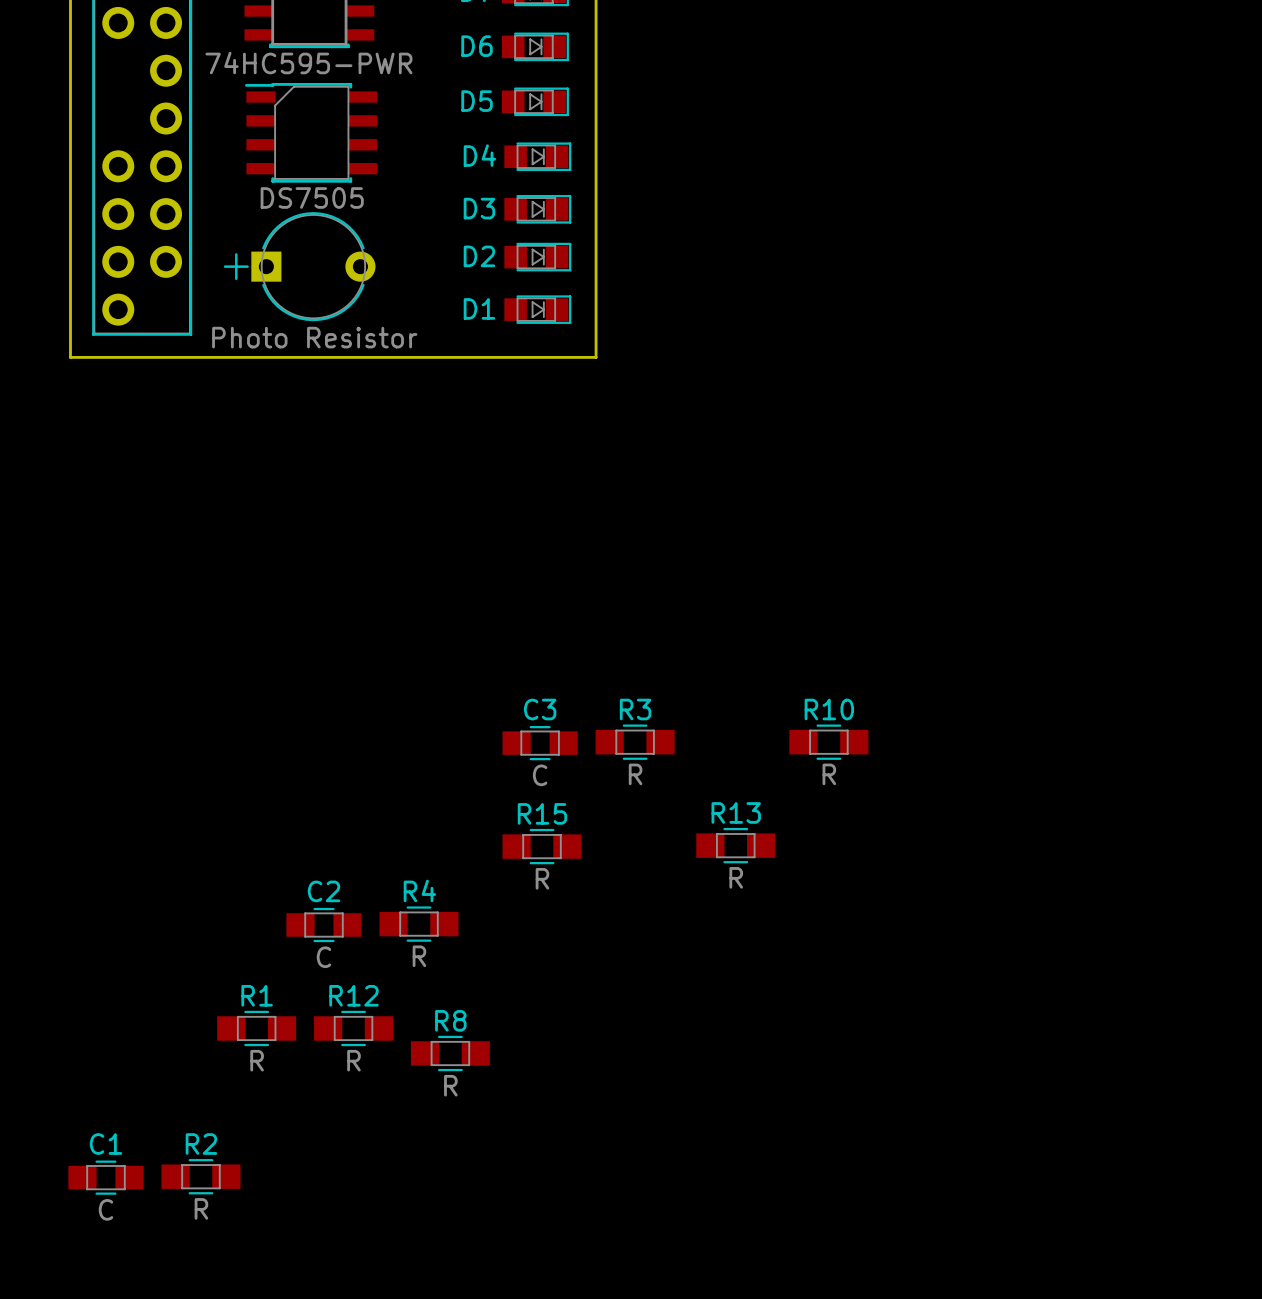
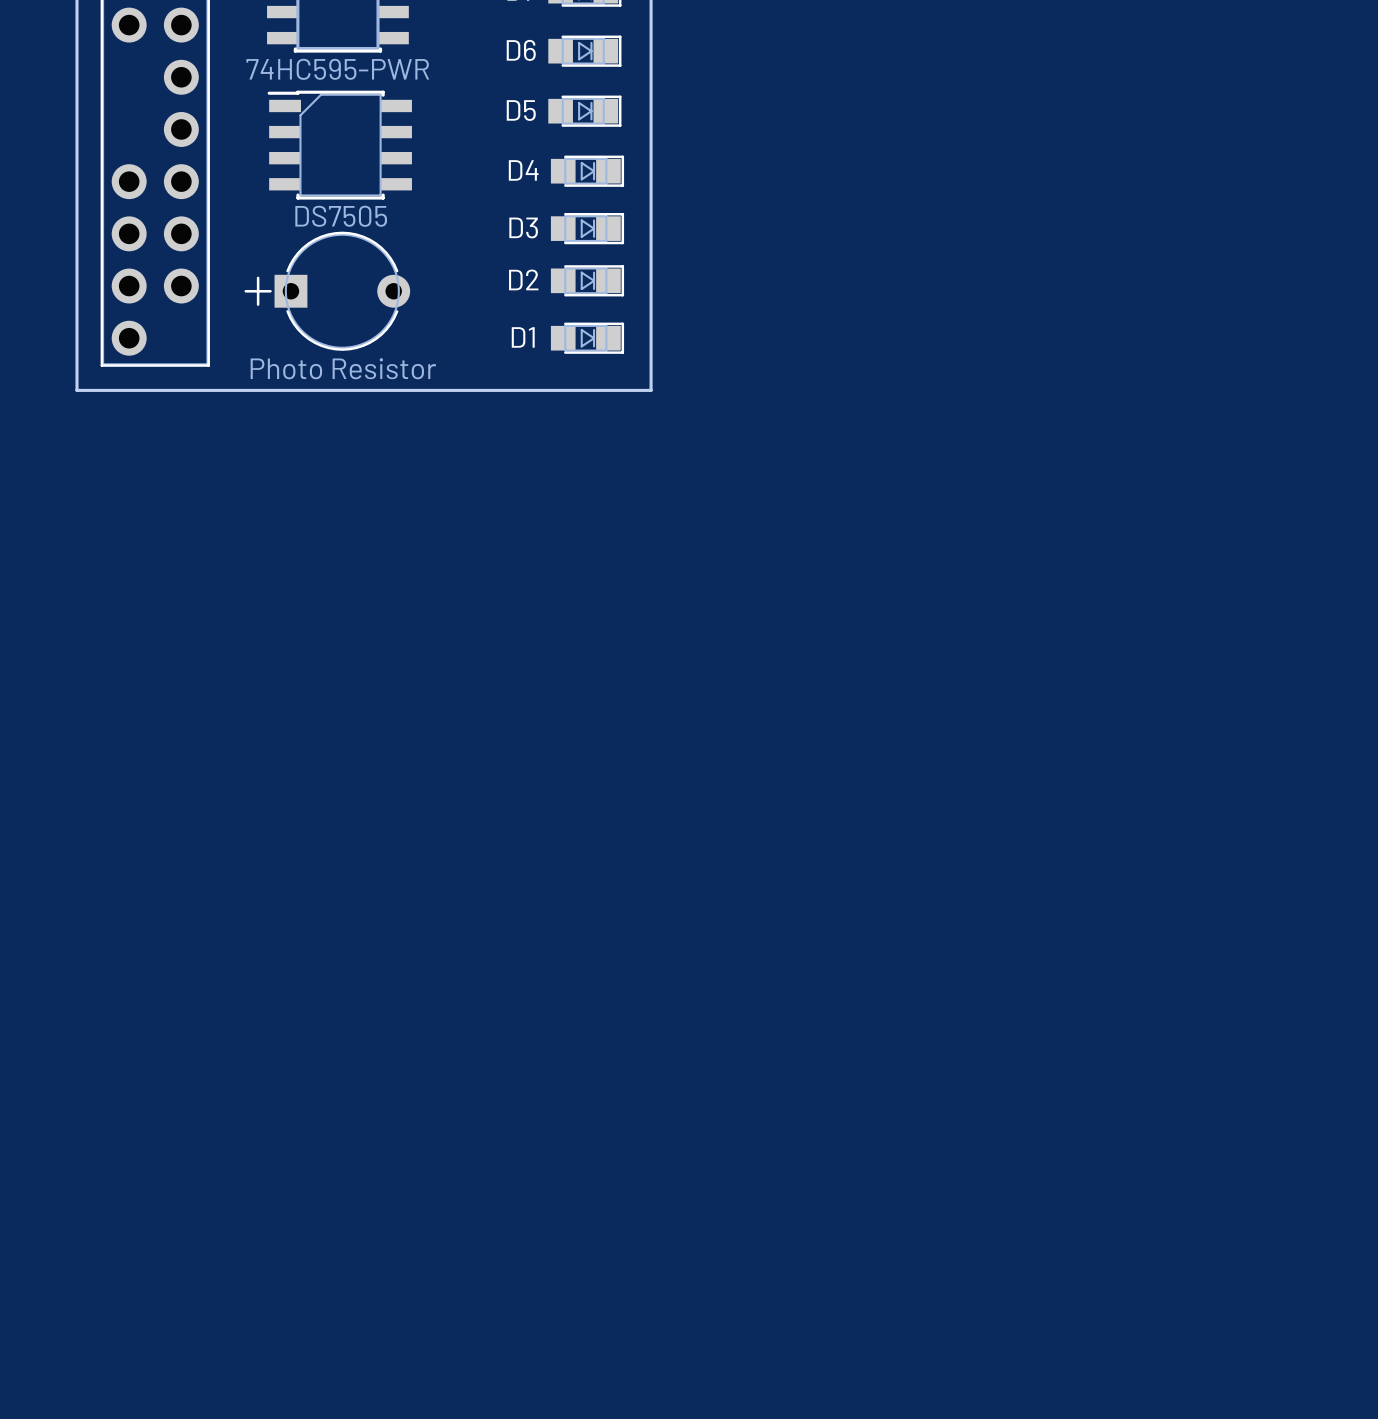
R3: R (635, 742) -> none
R10: R (828, 742) -> none
C3: C (540, 743) -> none
R13: R (735, 845) -> none
R15: R (542, 846) -> none
R4: R (418, 924) -> none
C2: C (324, 925) -> none
R1: R (256, 1028) -> none
R12: R (353, 1028) -> none
R8: R (450, 1053) -> none
R2: R (200, 1176) -> none
C1: C (105, 1177) -> none

